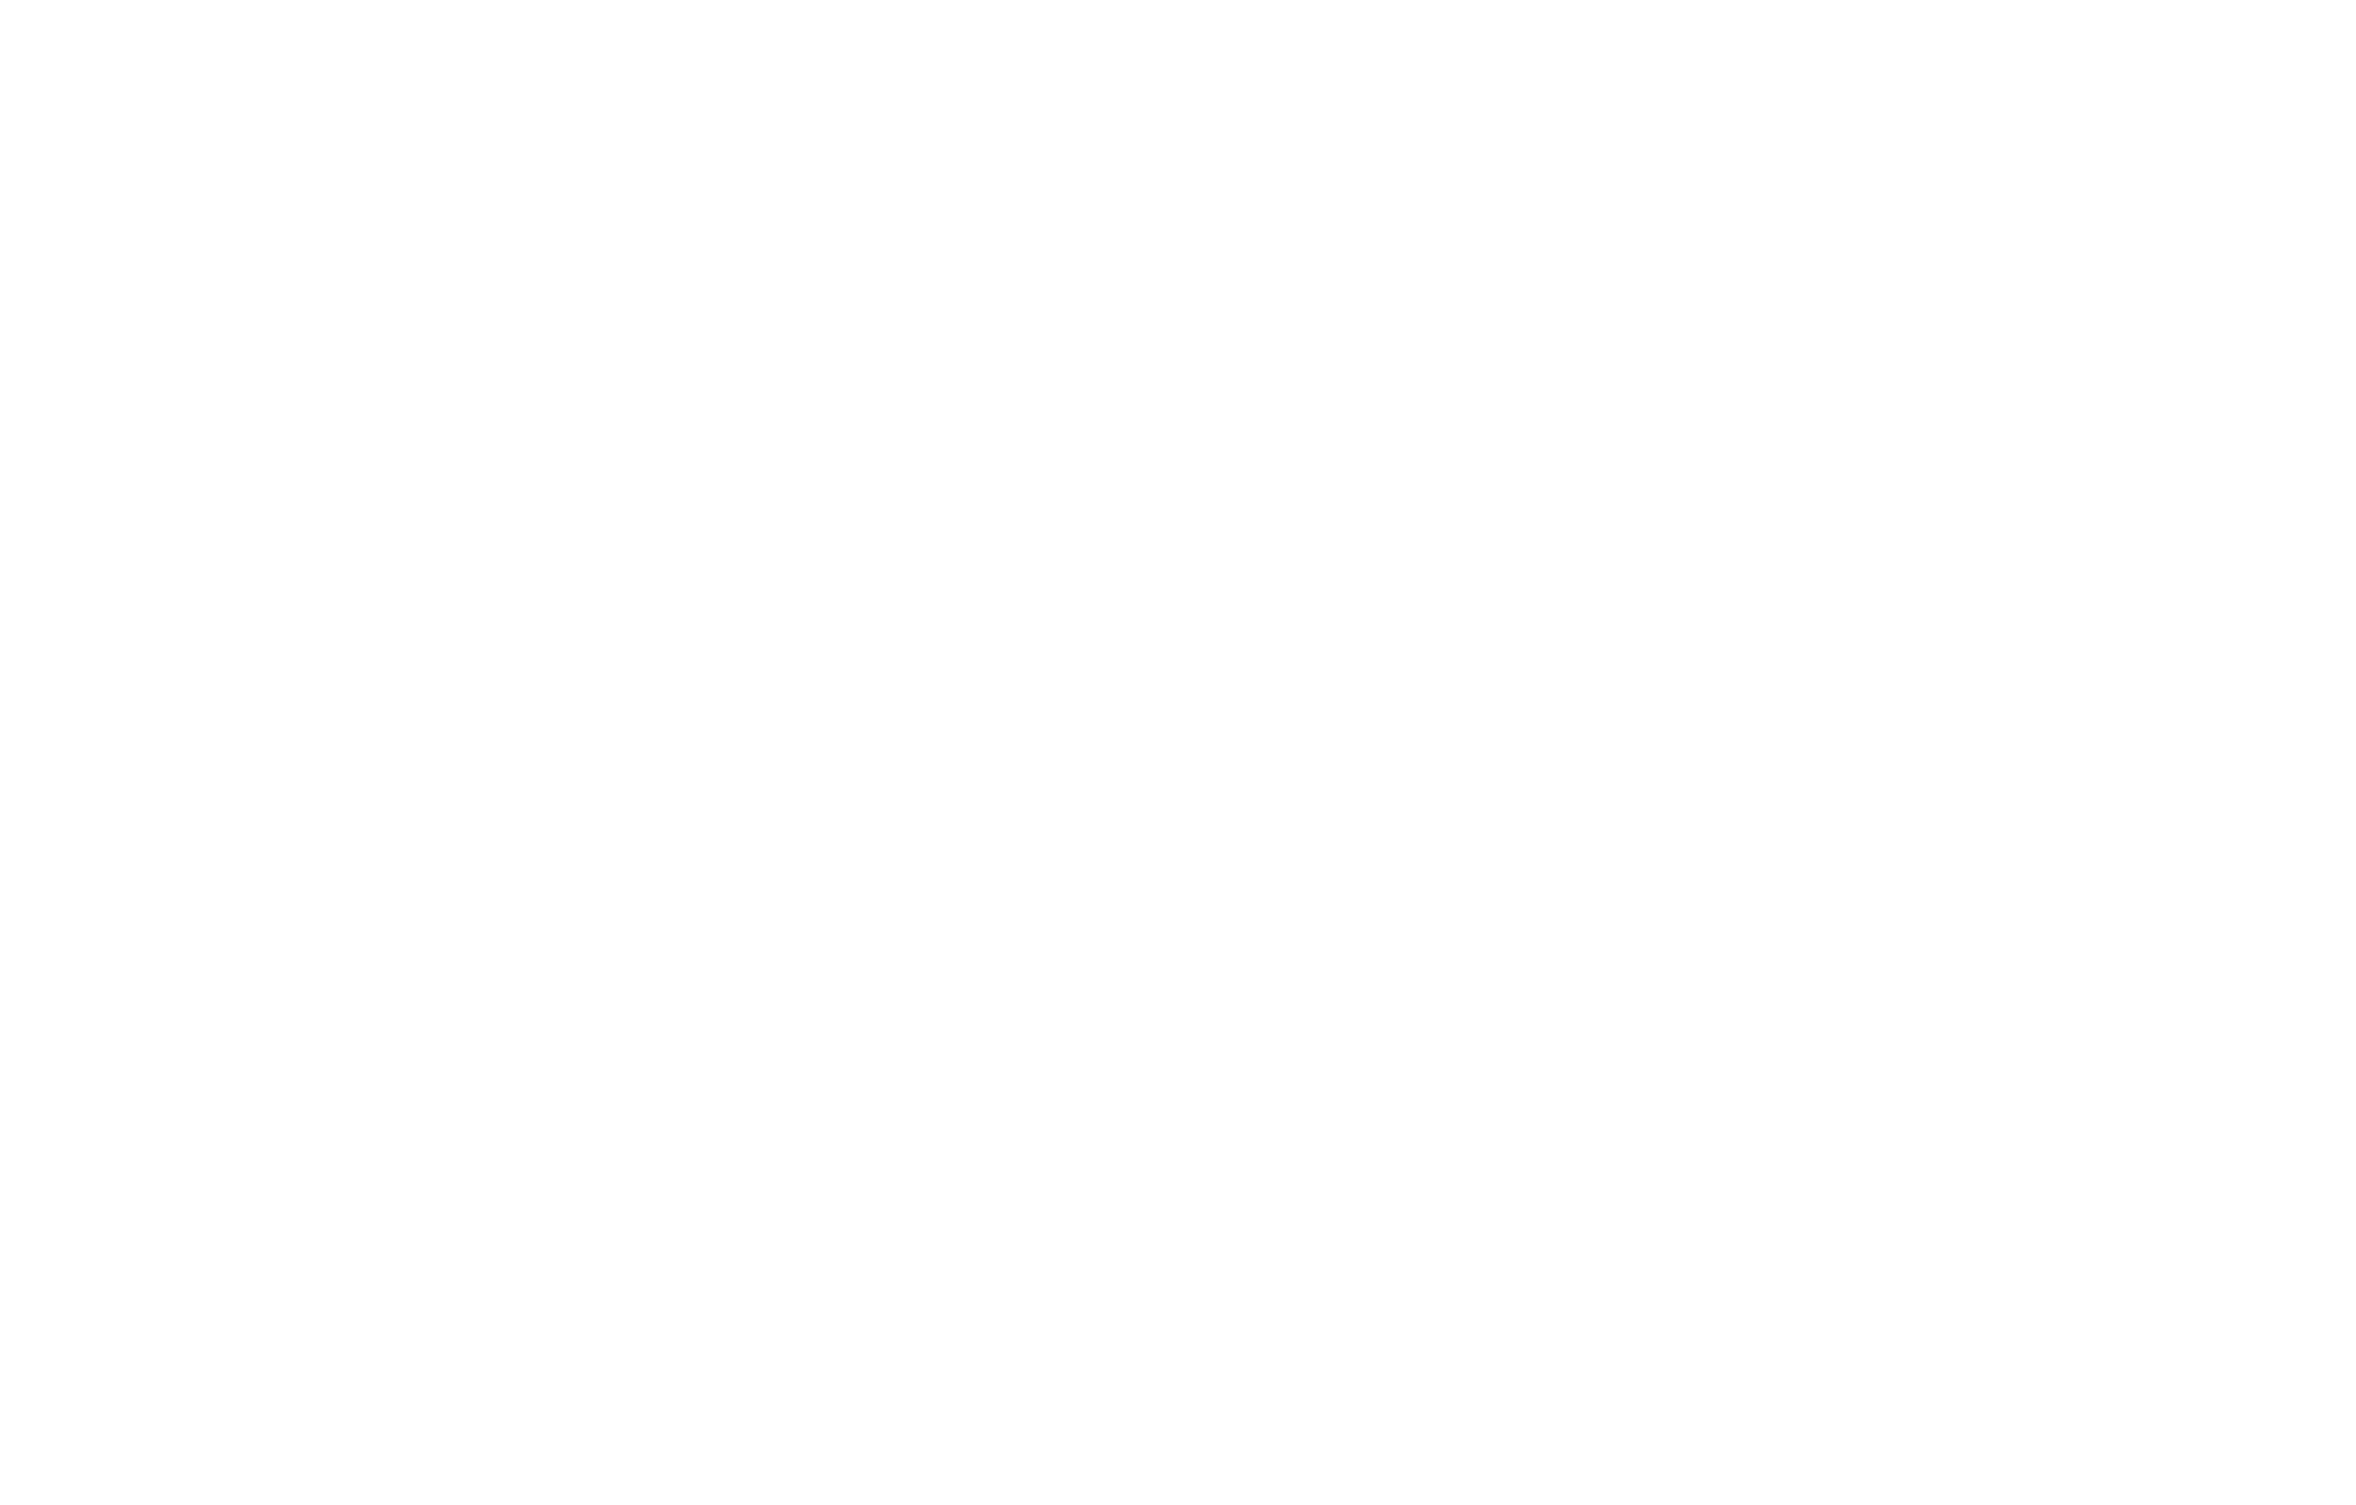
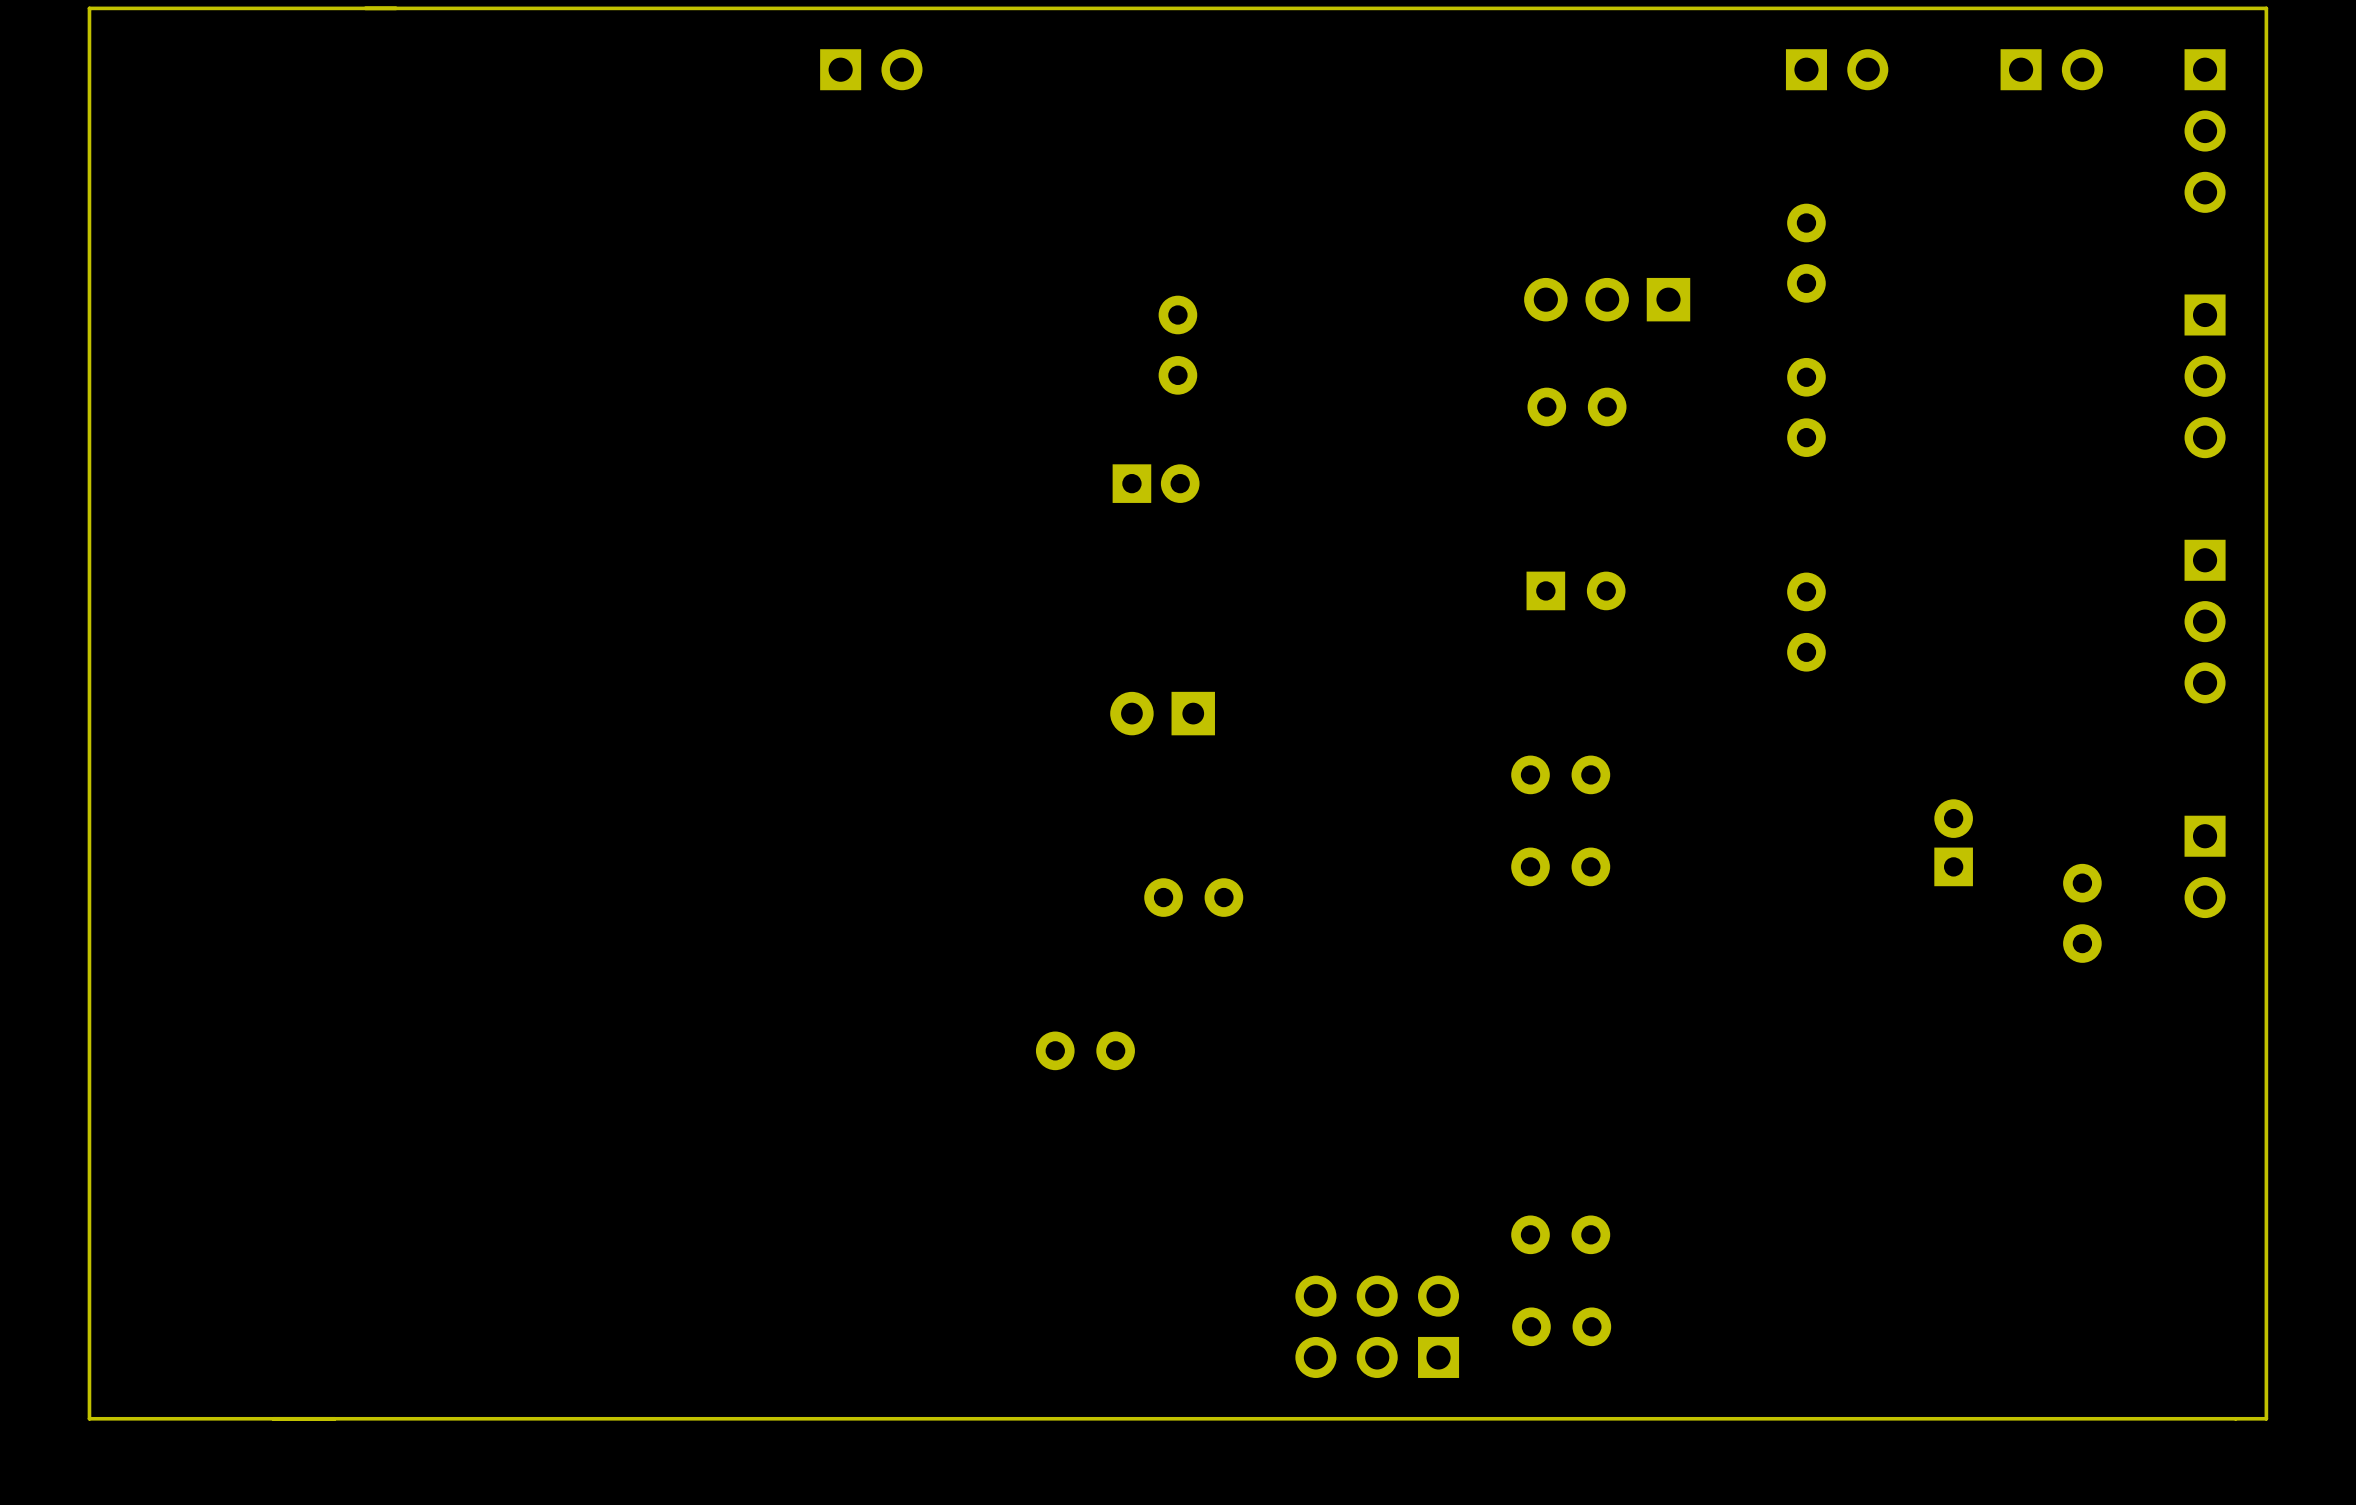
board edge: none -> (2266, 8) (89, 8) (89, 1418) (2266, 1418) (2266, 8)
part: none -> (871, 69)
part: none -> (1837, 69)
part: none -> (2051, 69)
part: none -> (2205, 131)
part: none -> (1806, 253)
part: none -> (1607, 299)
part: none -> (1177, 345)
part: none -> (2205, 376)
part: none -> (1576, 406)
part: none -> (1806, 407)
part: none -> (1156, 483)
part: none -> (1576, 590)
part: none -> (2205, 621)
part: none -> (1806, 622)
part: none -> (1162, 713)
part: none -> (1560, 774)
part: none -> (1953, 842)
part: none -> (1560, 866)
part: none -> (2205, 866)
part: none -> (1193, 897)
part: none -> (2082, 913)
part: none -> (1085, 1050)
part: none -> (1560, 1234)
part: none -> (1377, 1326)
part: none -> (1561, 1326)

